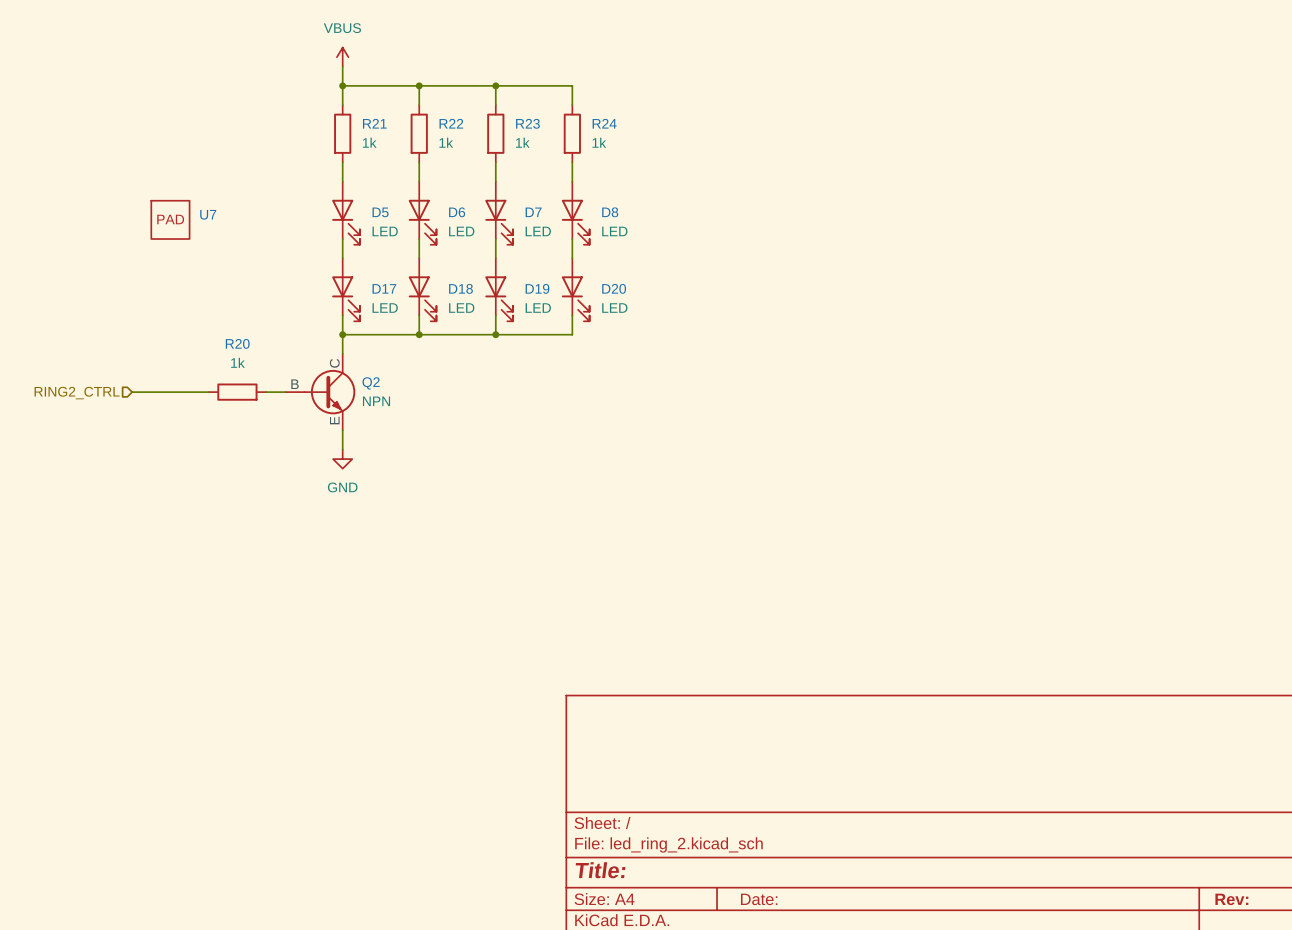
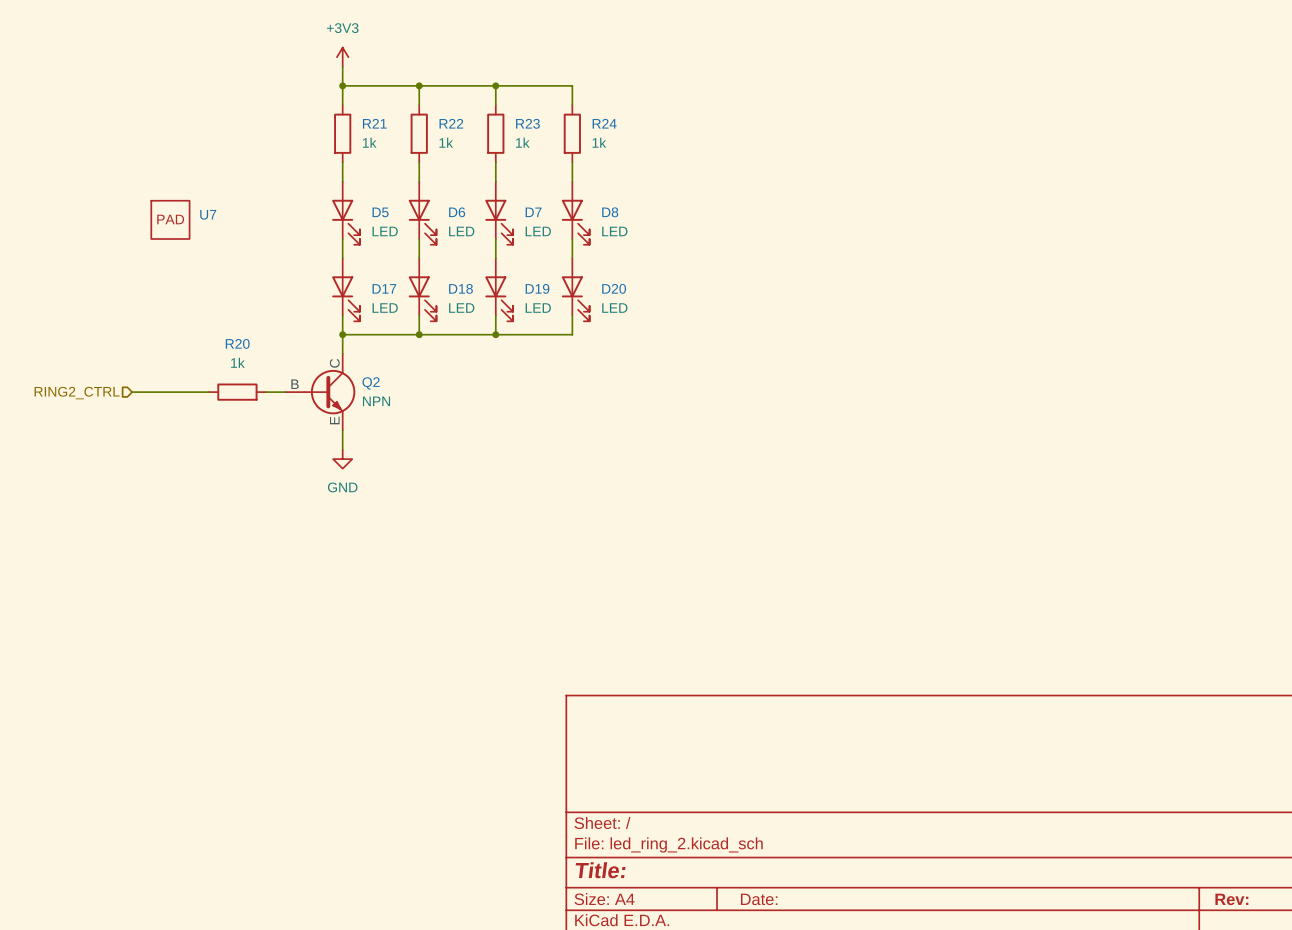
power symbol: VBUS (342, 57) -> +3V3 (342, 57)

